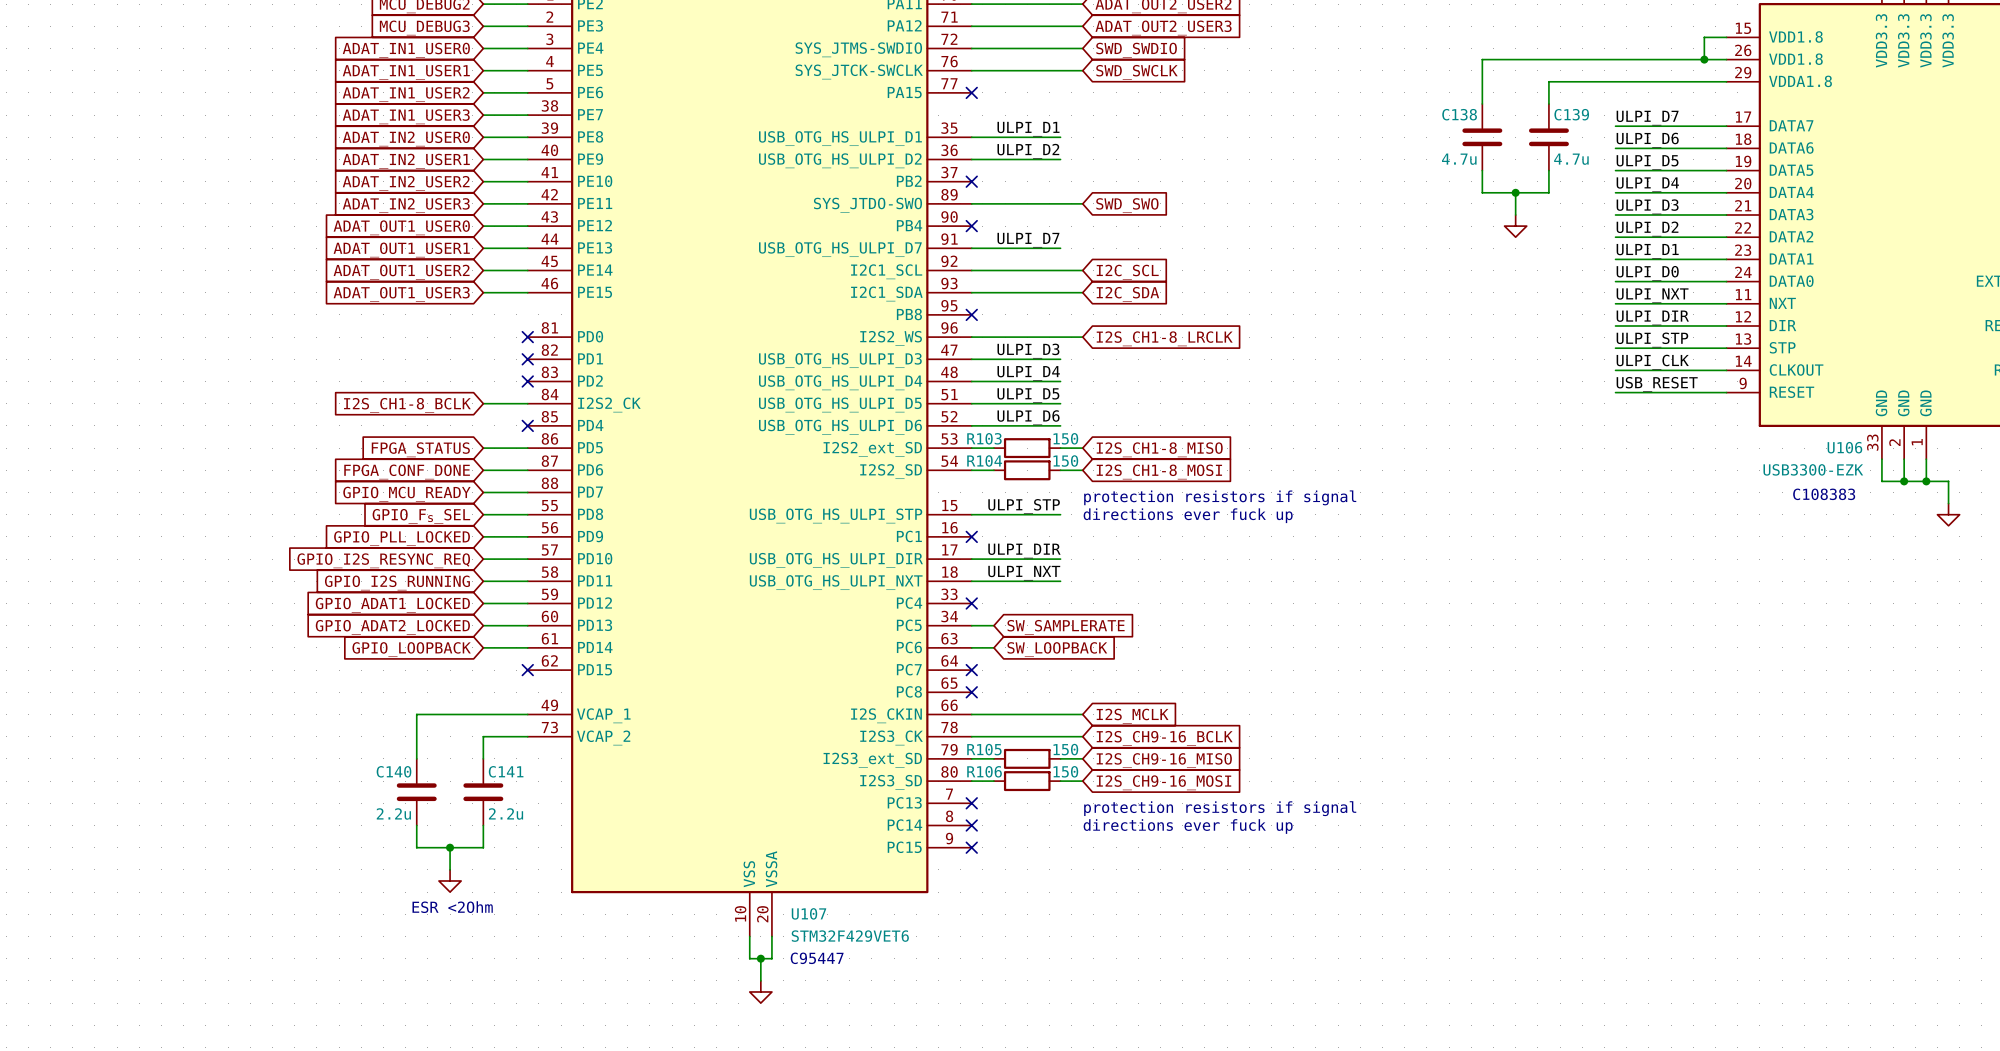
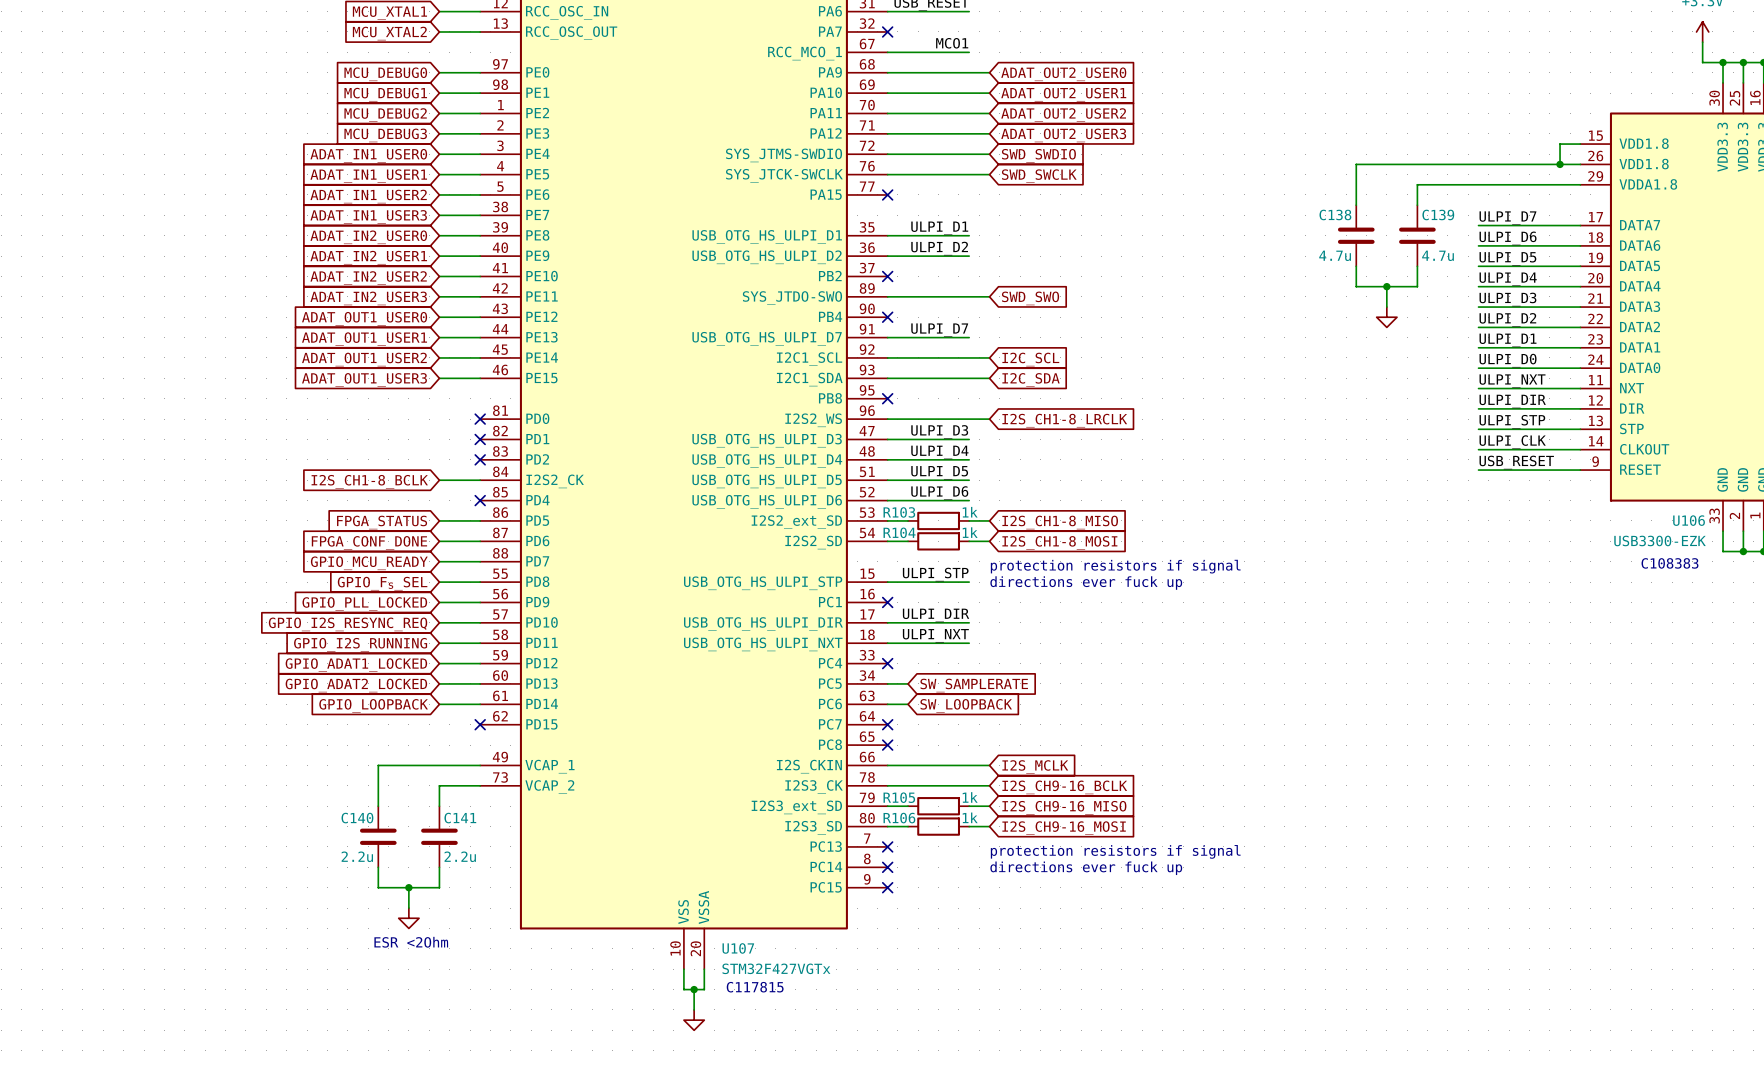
R103 value: 150 (1065, 438) -> 1k (970, 512)
R104 value: 150 (1065, 461) -> 1k (970, 532)
R105 value: 150 (1065, 749) -> 1k (970, 797)
R106 value: 150 (1065, 771) -> 1k (970, 817)
U107 value: STM32F429VET6 (850, 936) -> STM32F427VGTx (776, 968)
text: none -> C117815 (755, 987)
text: C95447 (817, 958) -> none

